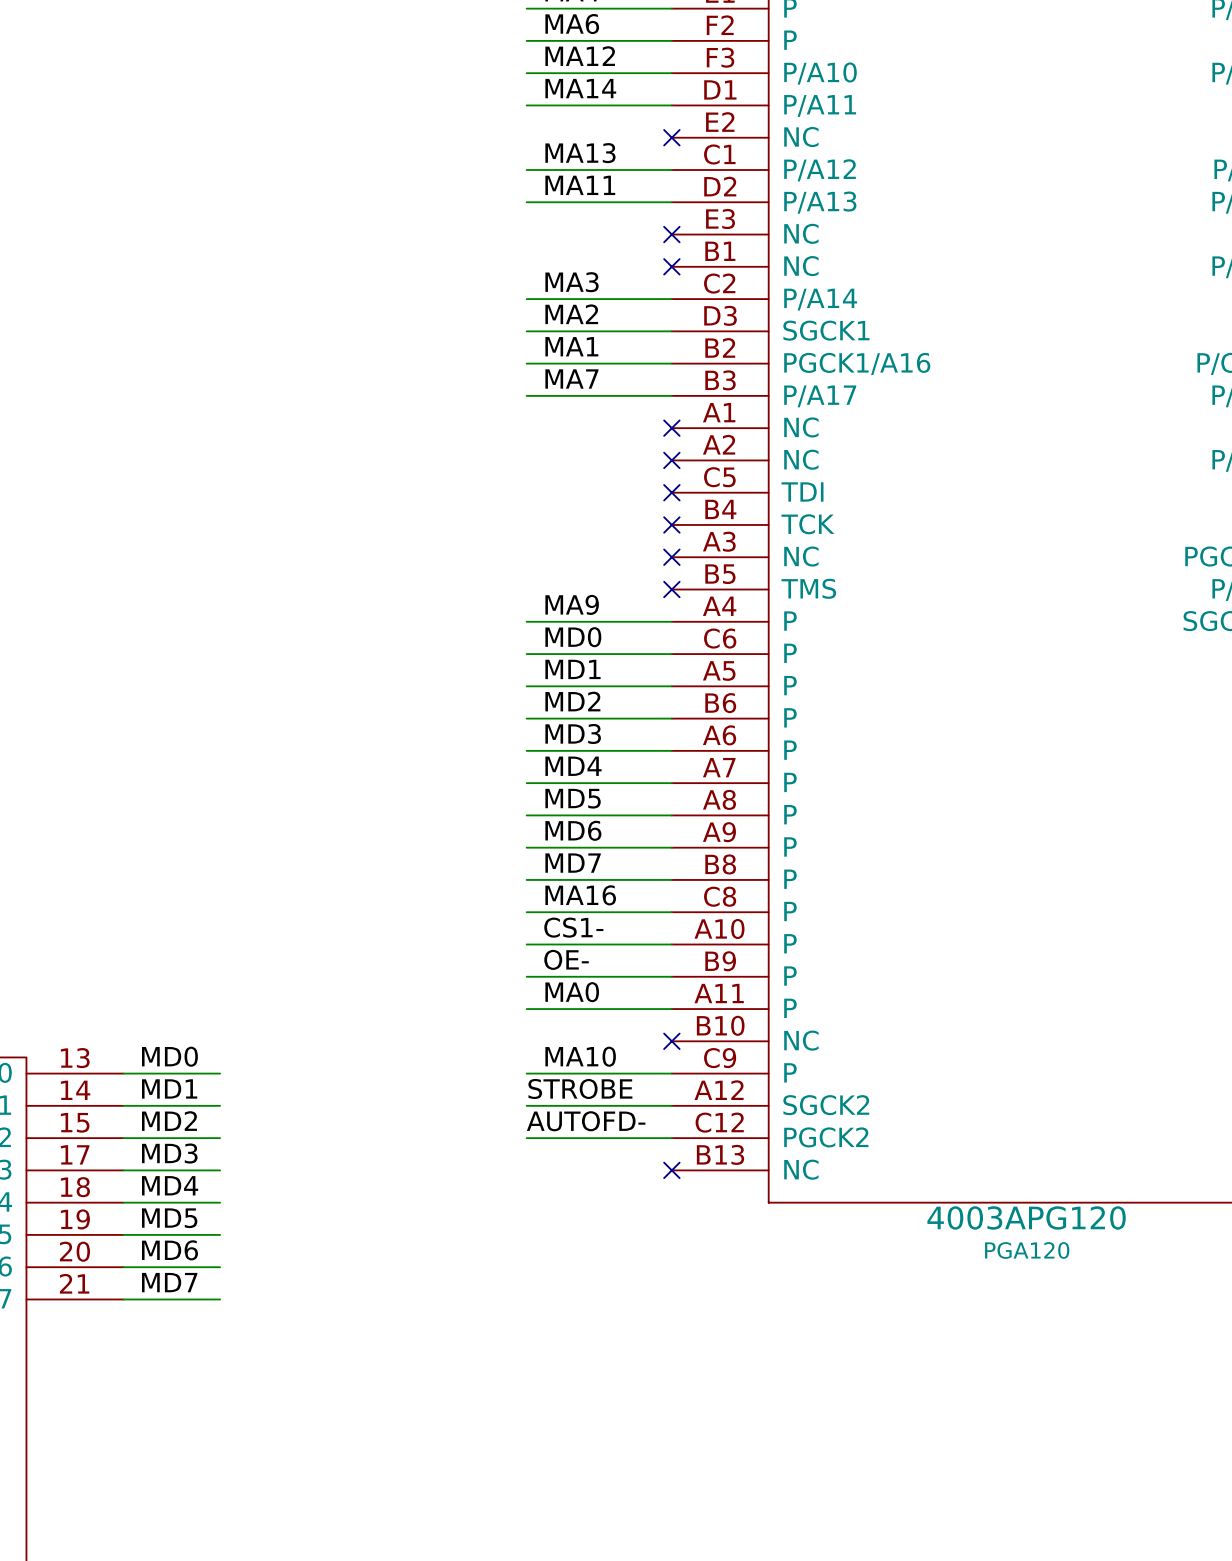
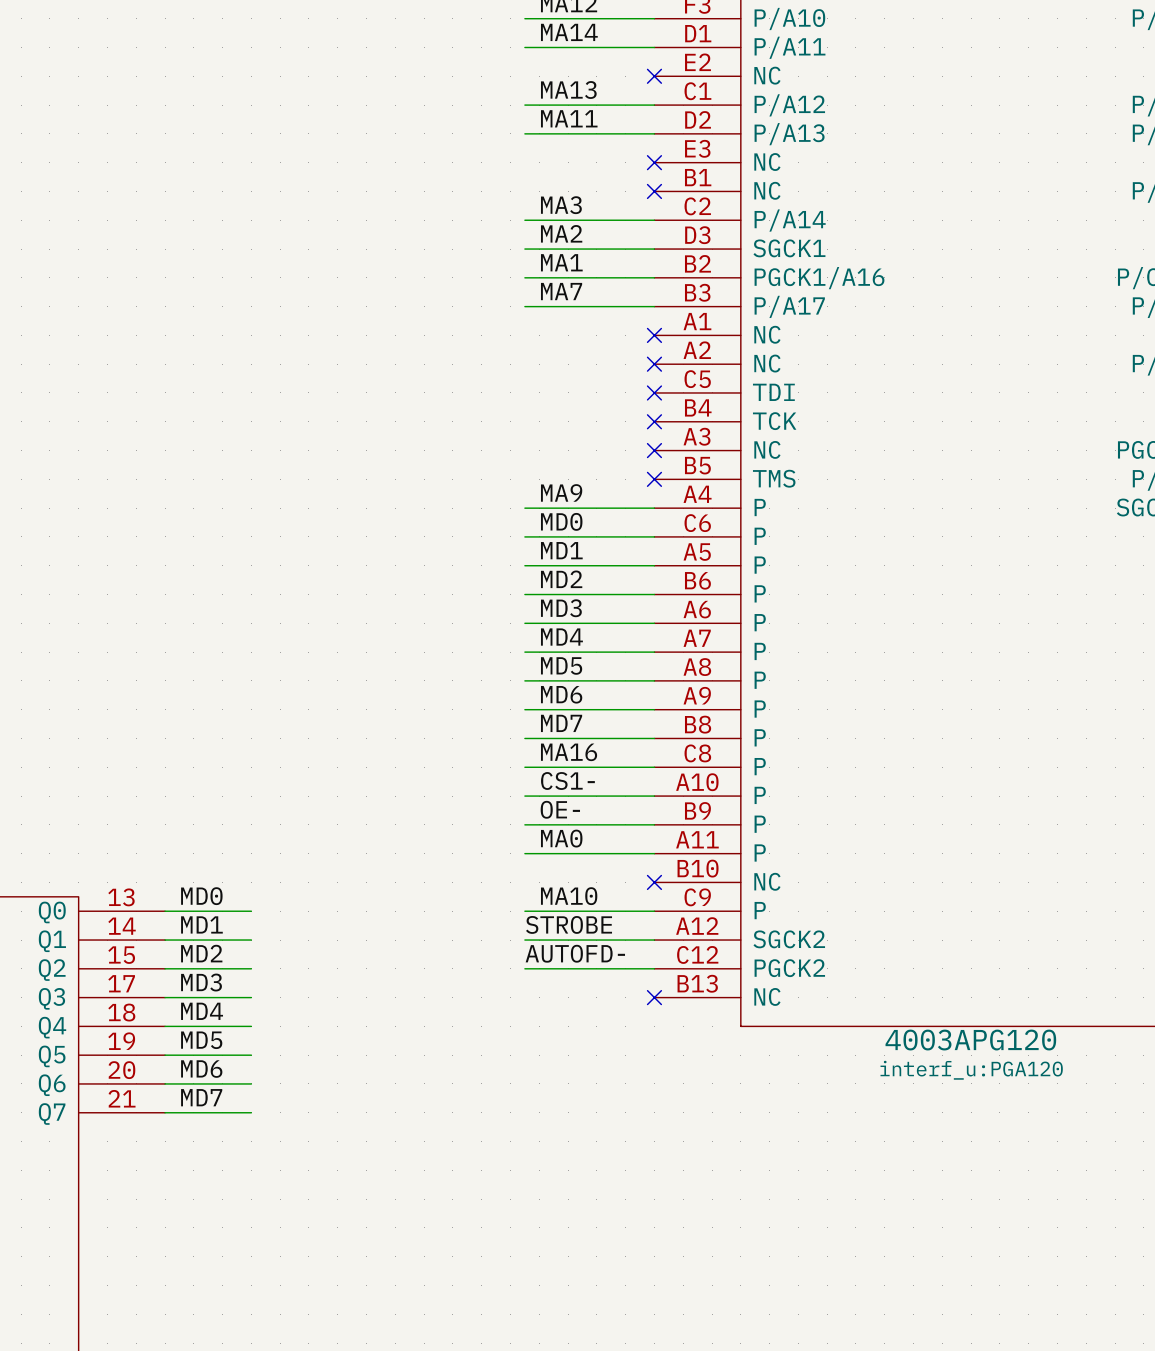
part text: PGA120 (1027, 1250) -> interf_u:PGA120 (971, 1070)

